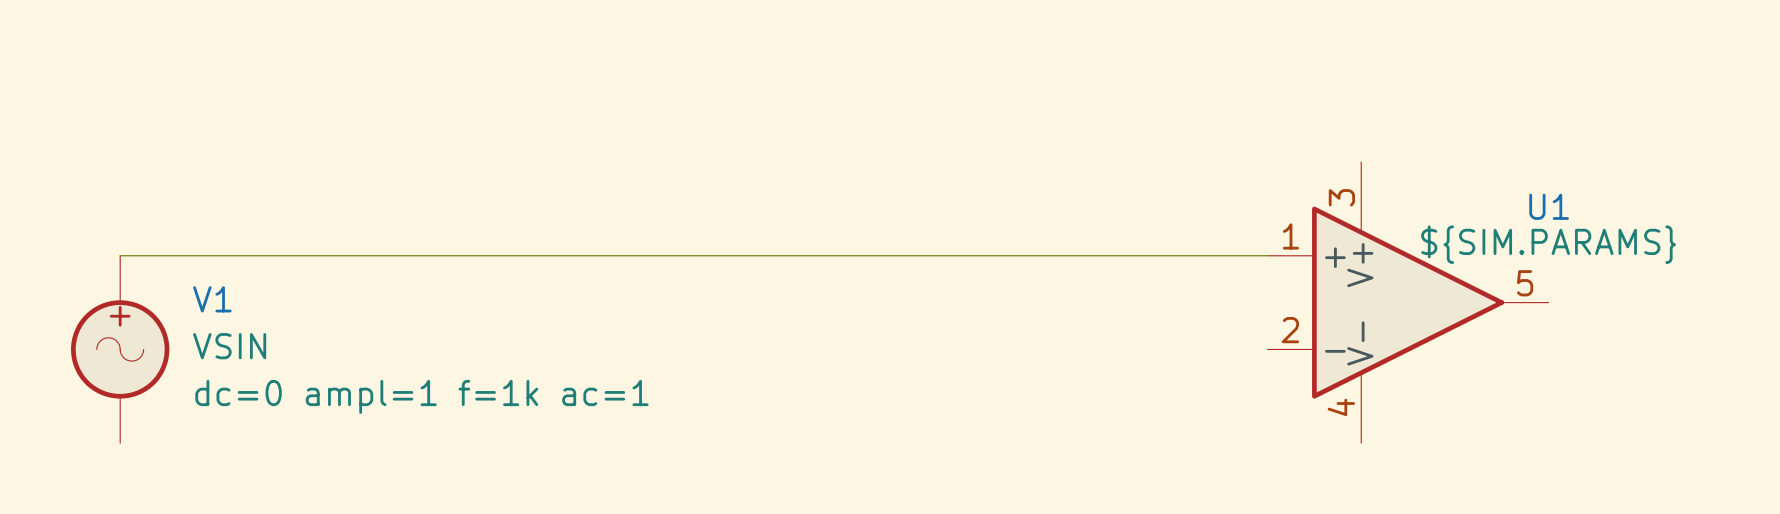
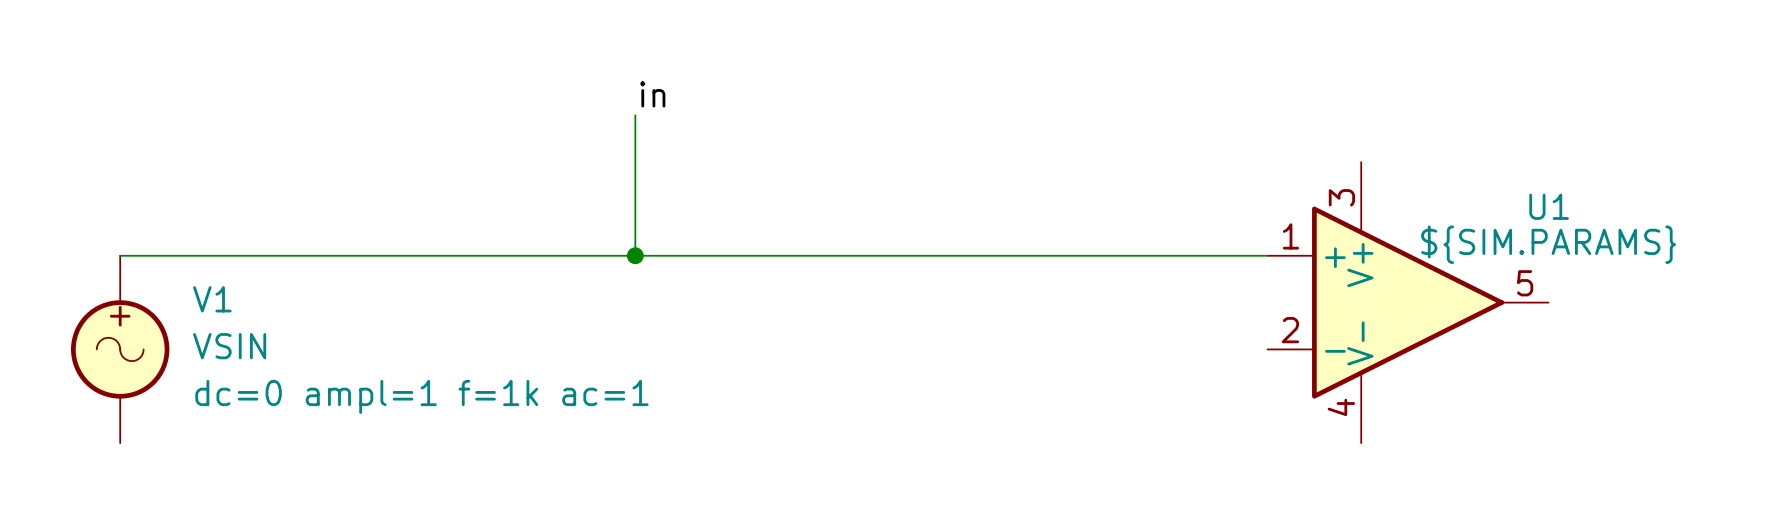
label: none -> in (652, 94)
wire: none -> (635, 115) (635, 255)
junction: none -> (635, 255)

